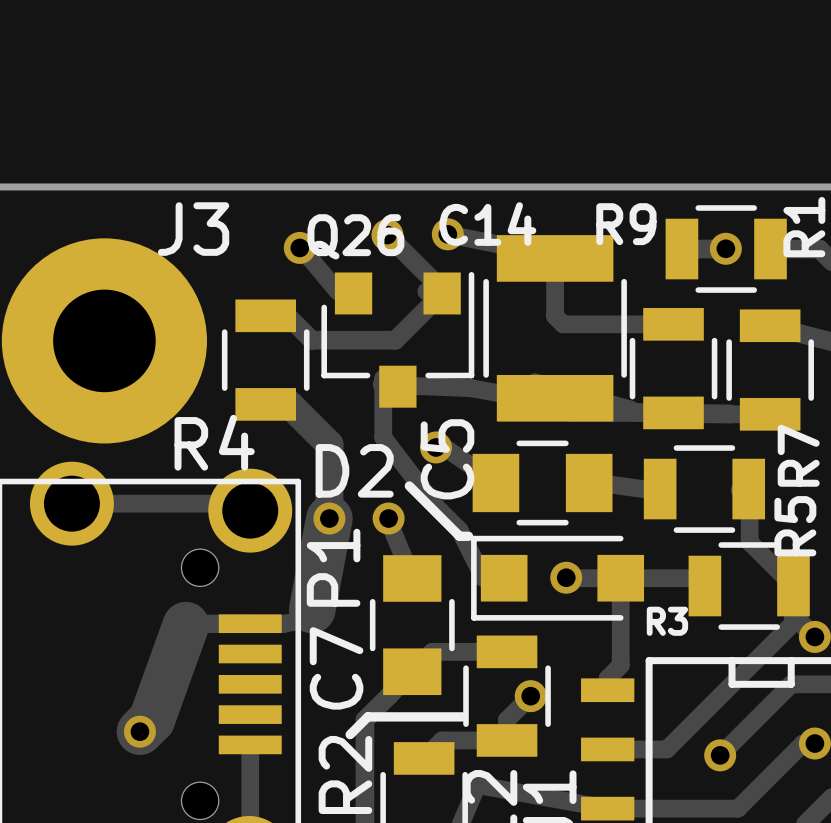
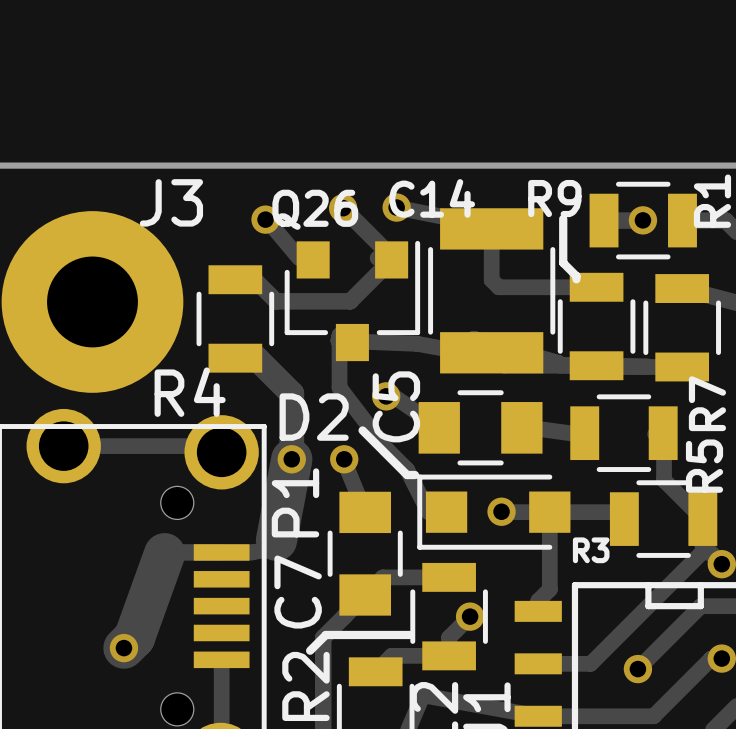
line: none -> (563, 218) (563, 262) (576, 276) (576, 279)

